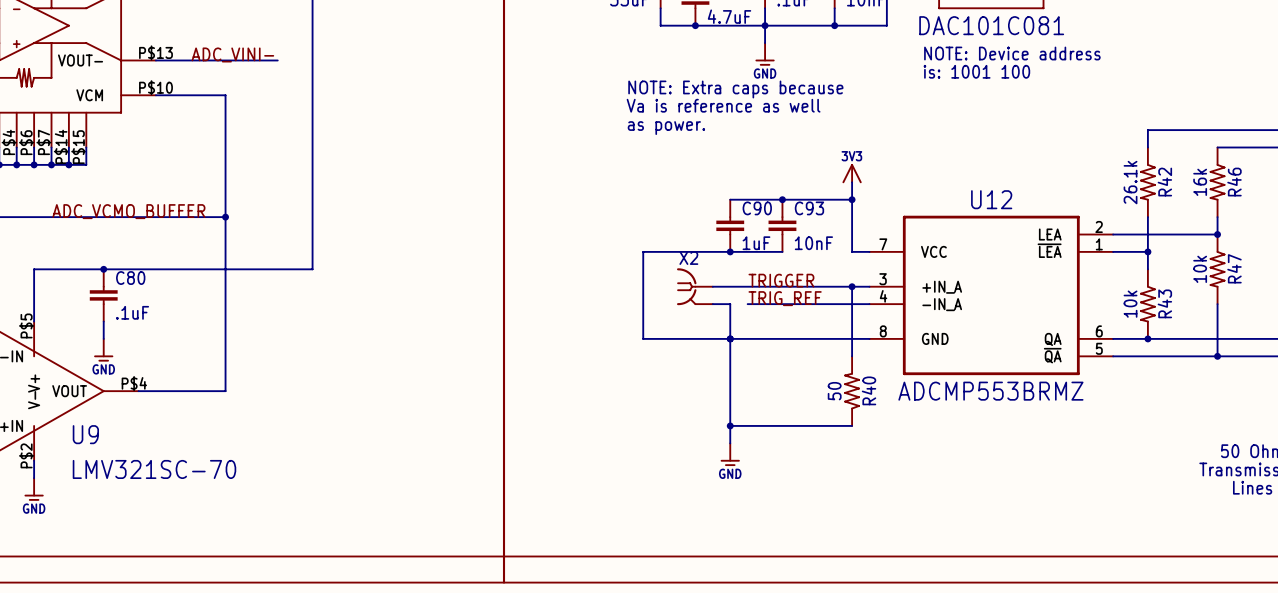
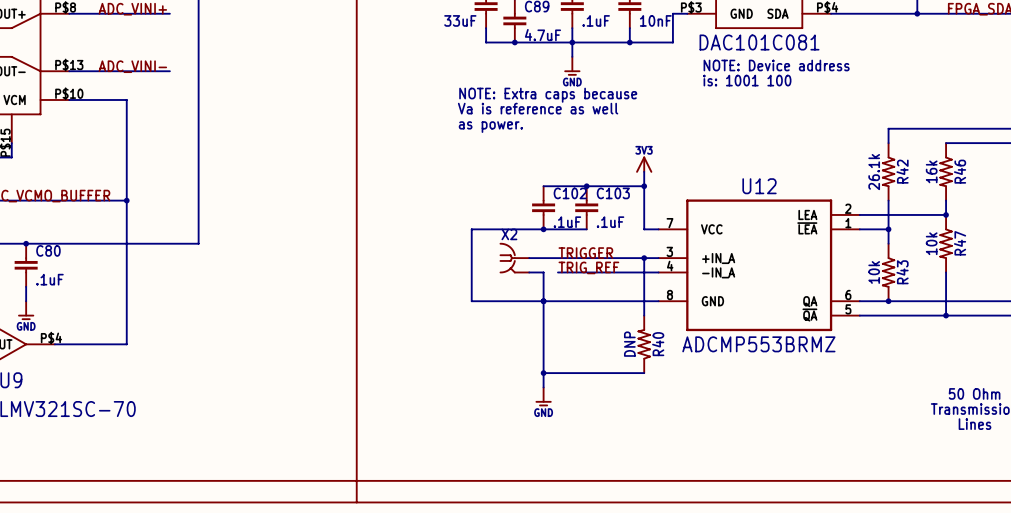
C90 name: C90 (757, 208) -> C102 (570, 193)
C93 name: C93 (809, 208) -> C103 (613, 193)
C90 value: 1uF (756, 243) -> .1uF (567, 222)
C93 value: 10nF (813, 243) -> .1uF (610, 222)
R40 value: 50 (834, 391) -> DNP (629, 344)

